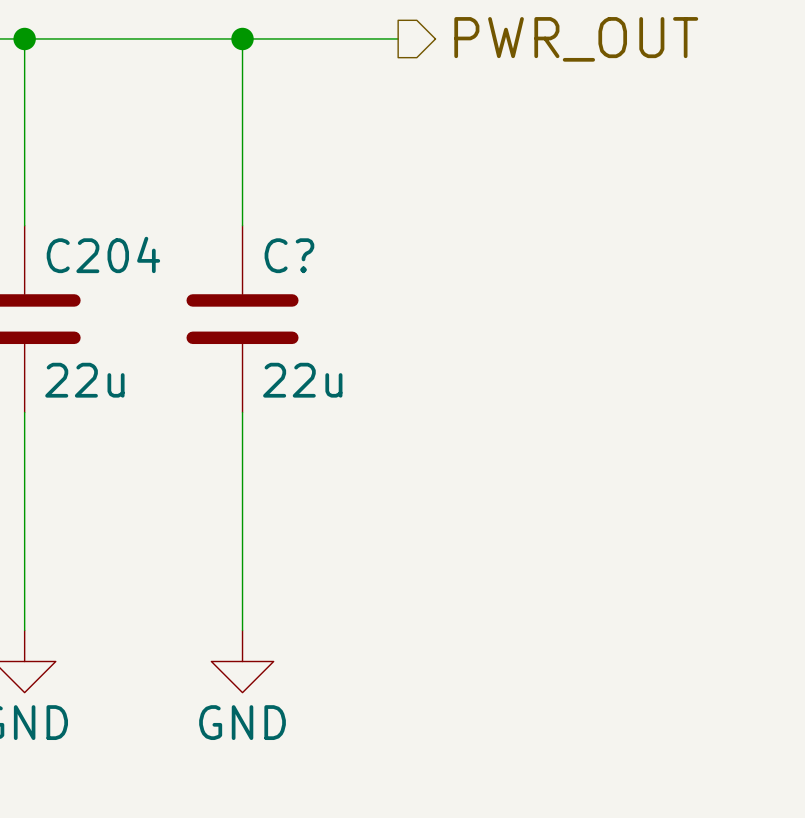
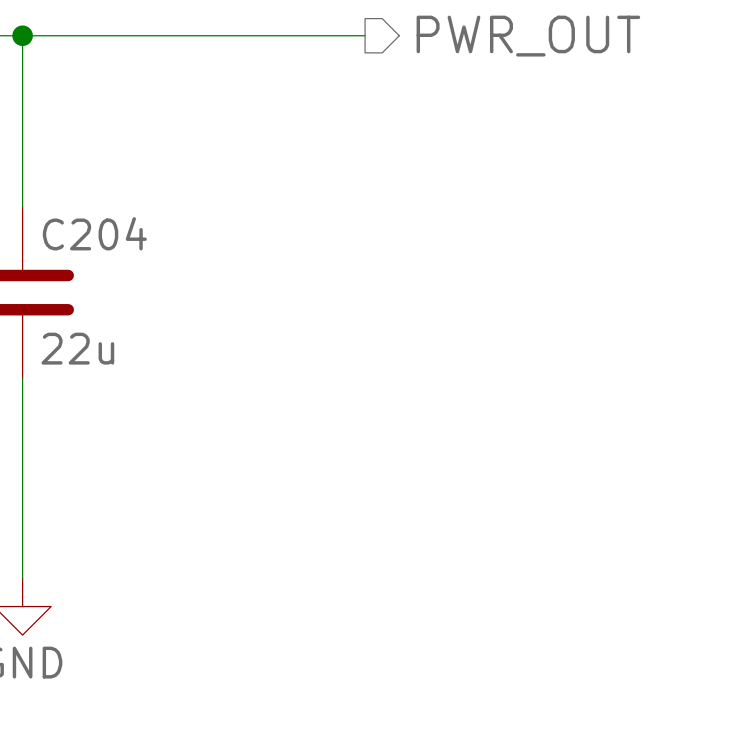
wire: (242, 38) (242, 225) -> none
junction: (242, 38) -> none
C?: 22u (242, 319) -> none
wire: (242, 412) (242, 630) -> none
power symbol: GND (242, 661) -> none

